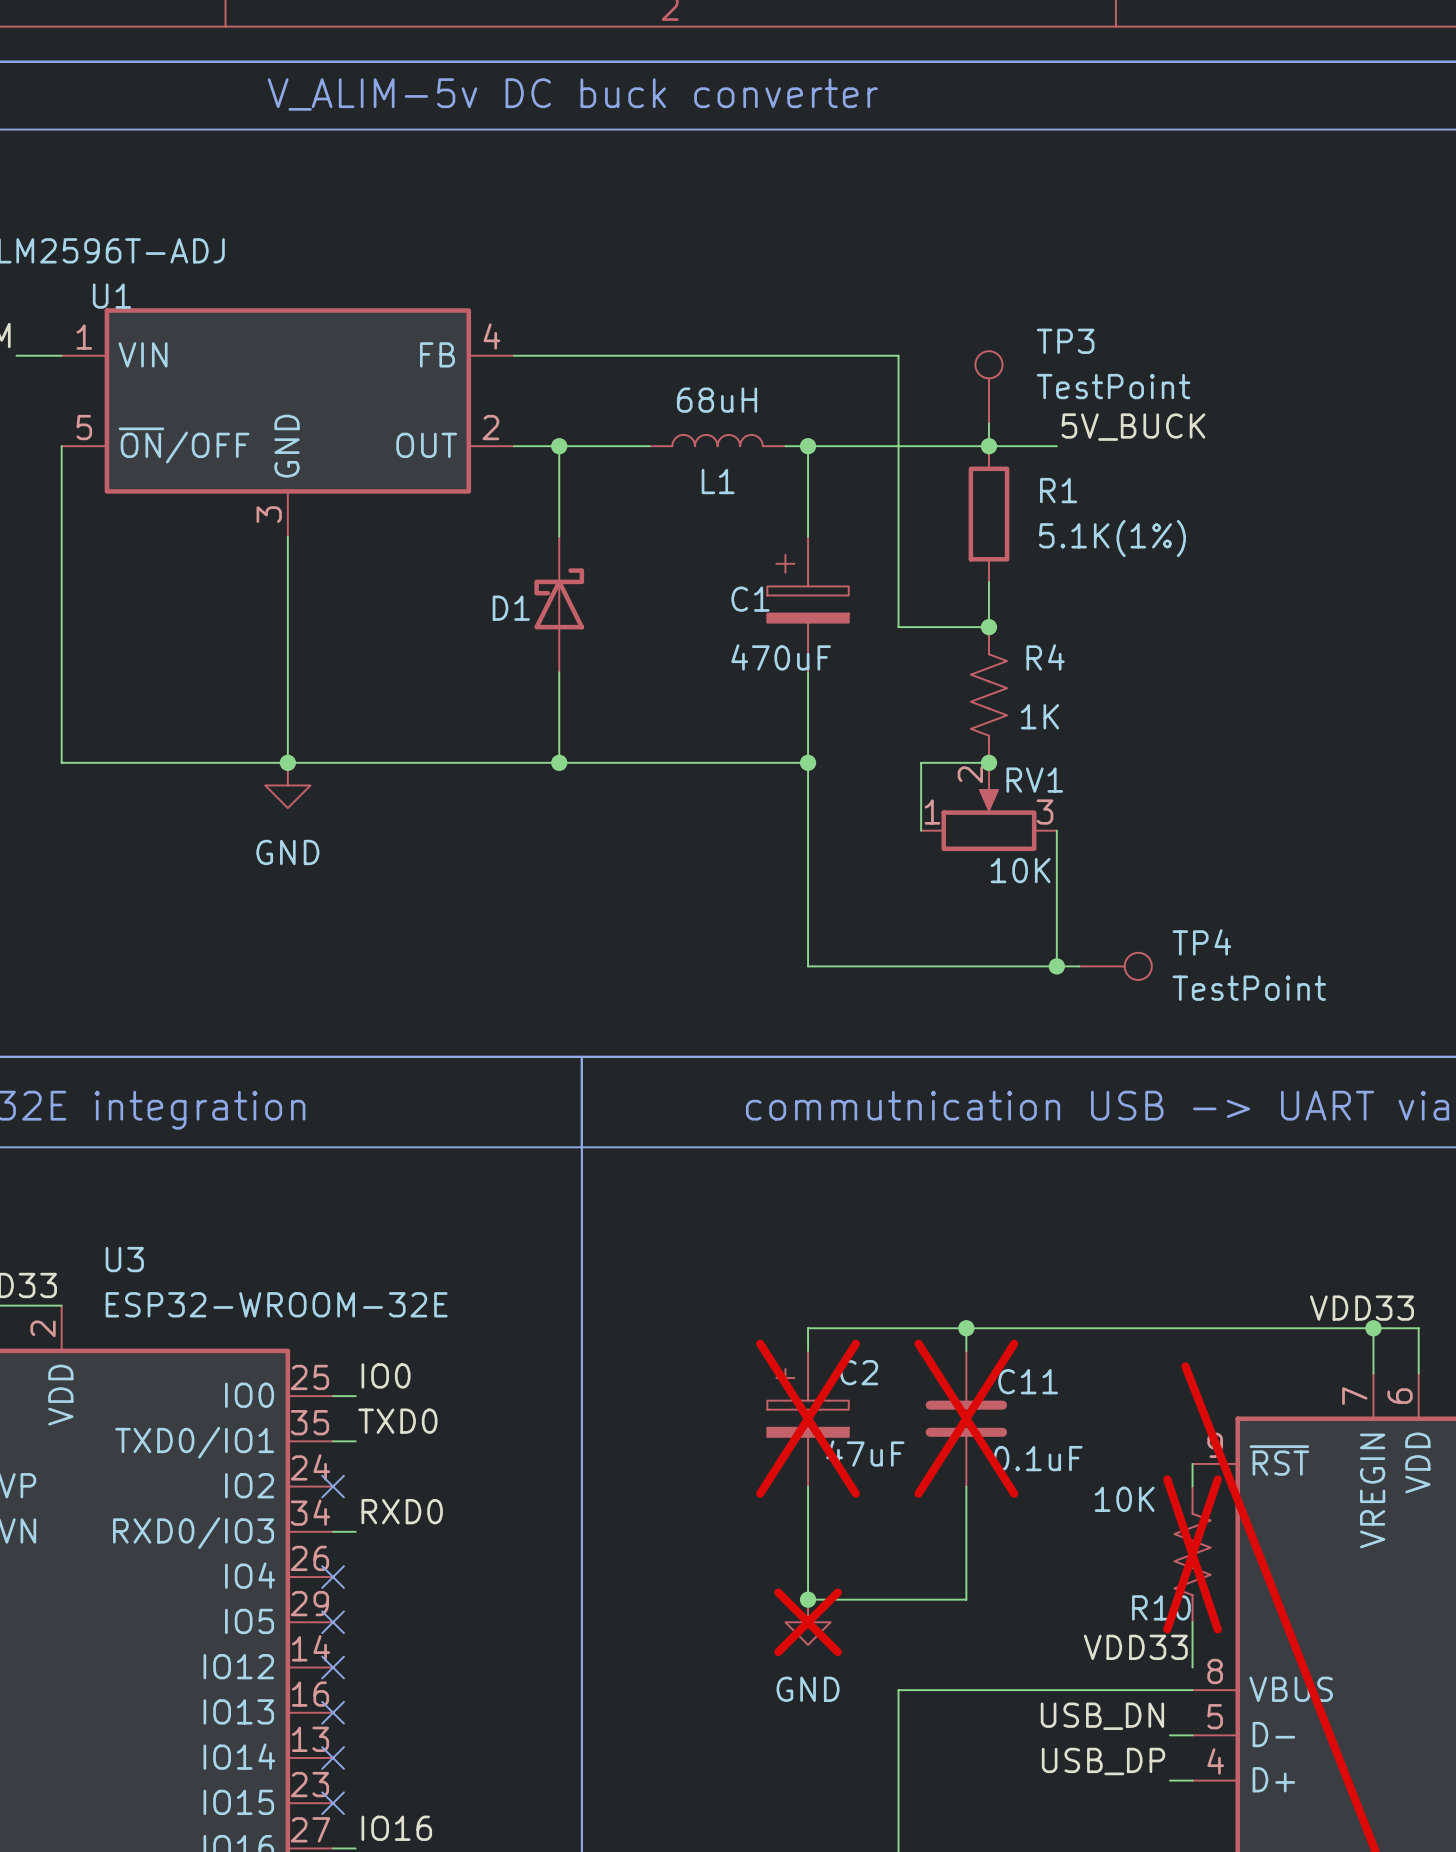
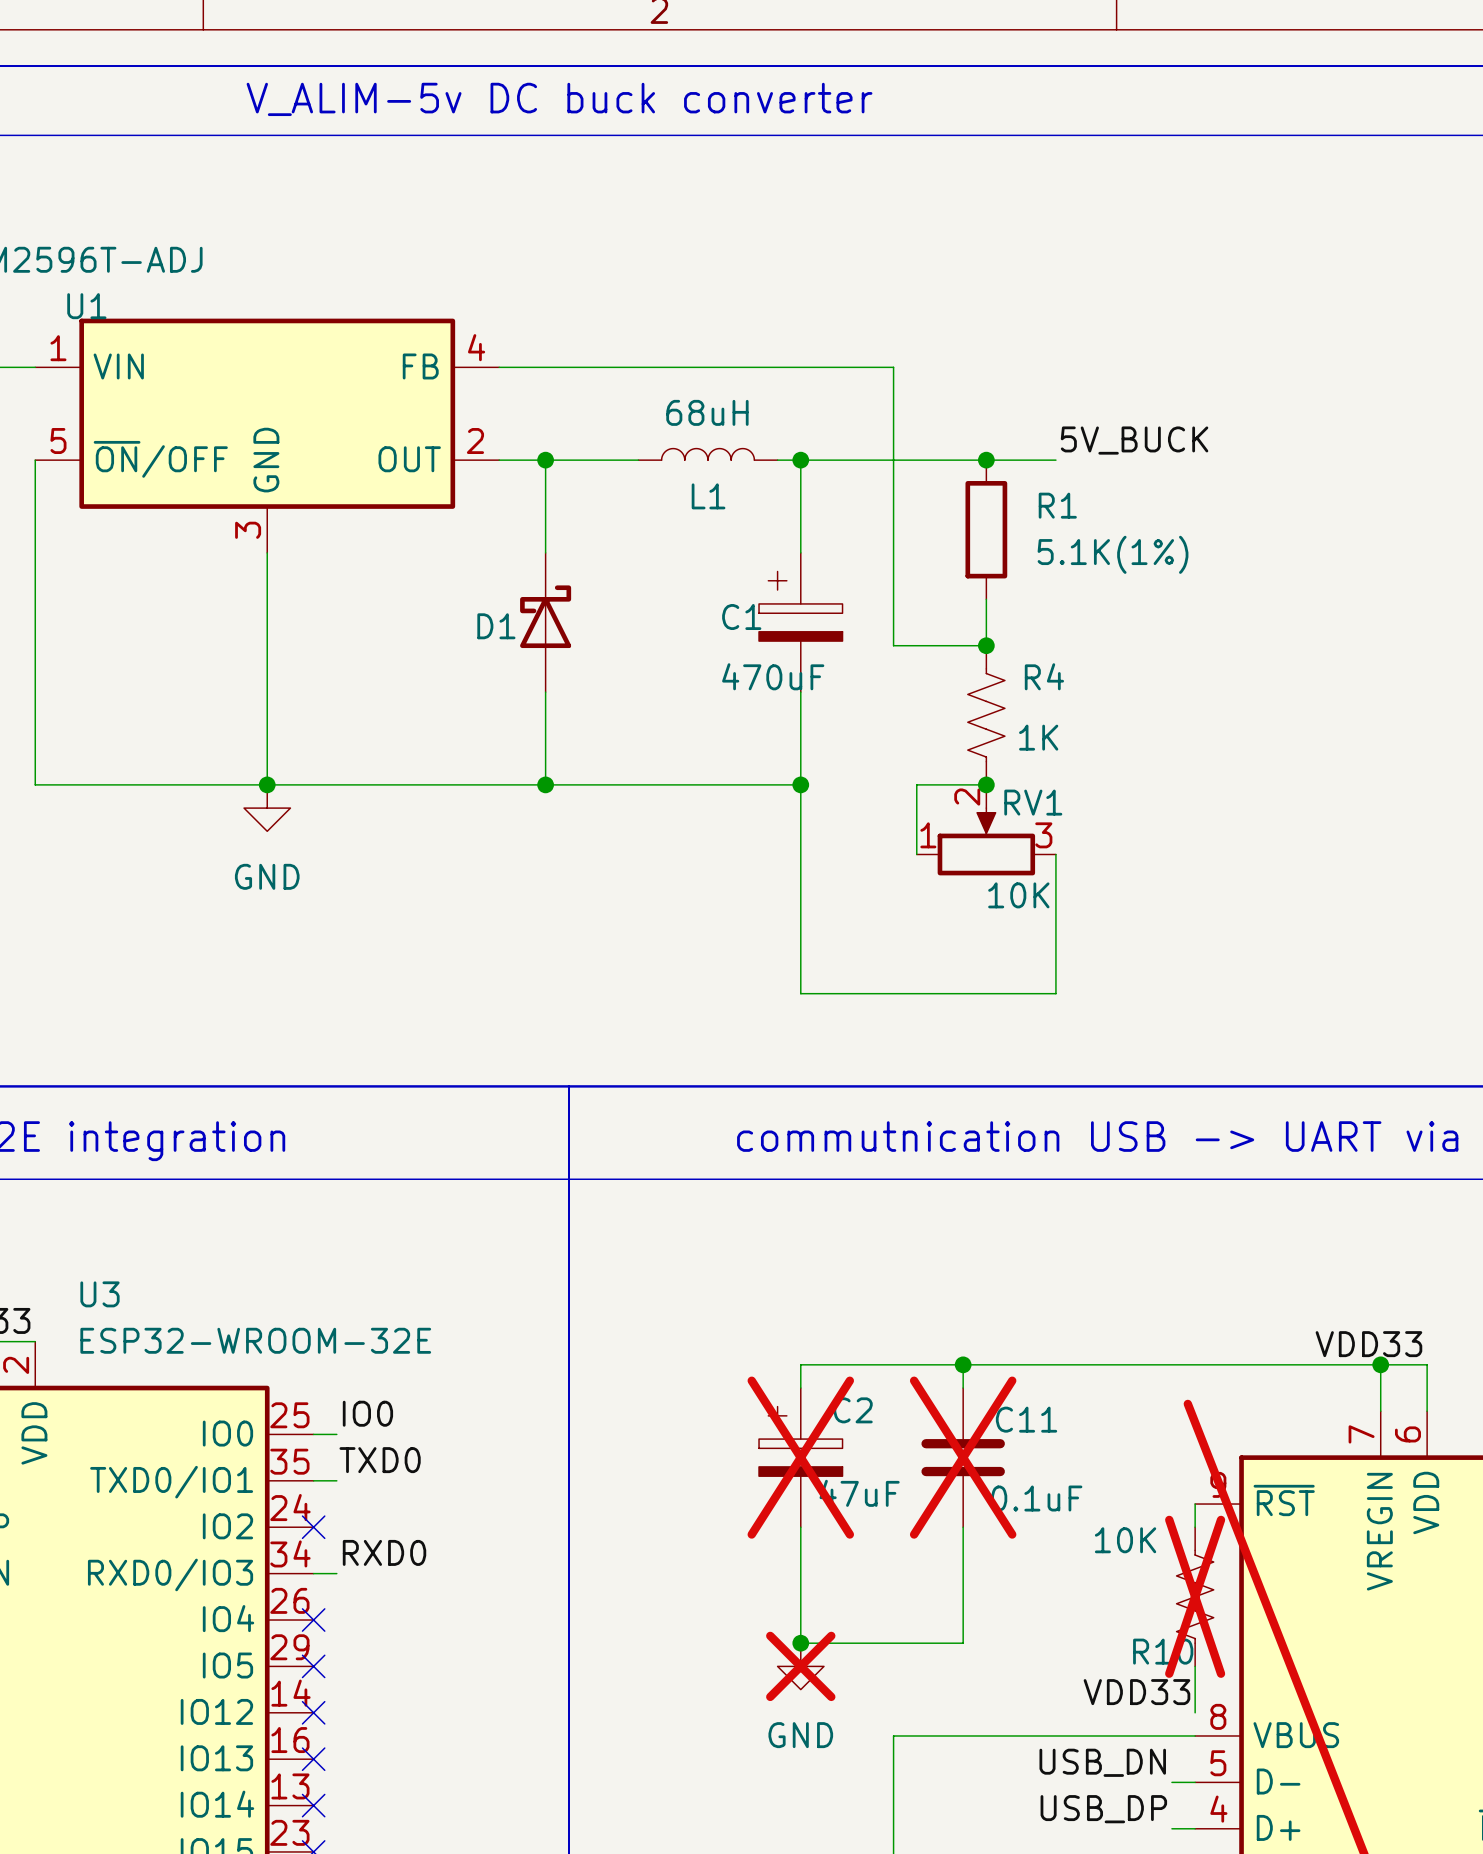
TP3: TestPoint (988, 387) -> none
wire: (988, 423) (988, 446) -> none
wire: (1056, 966) (1079, 966) -> none
junction: (1056, 966) -> none
TP4: TestPoint (1115, 966) -> none

